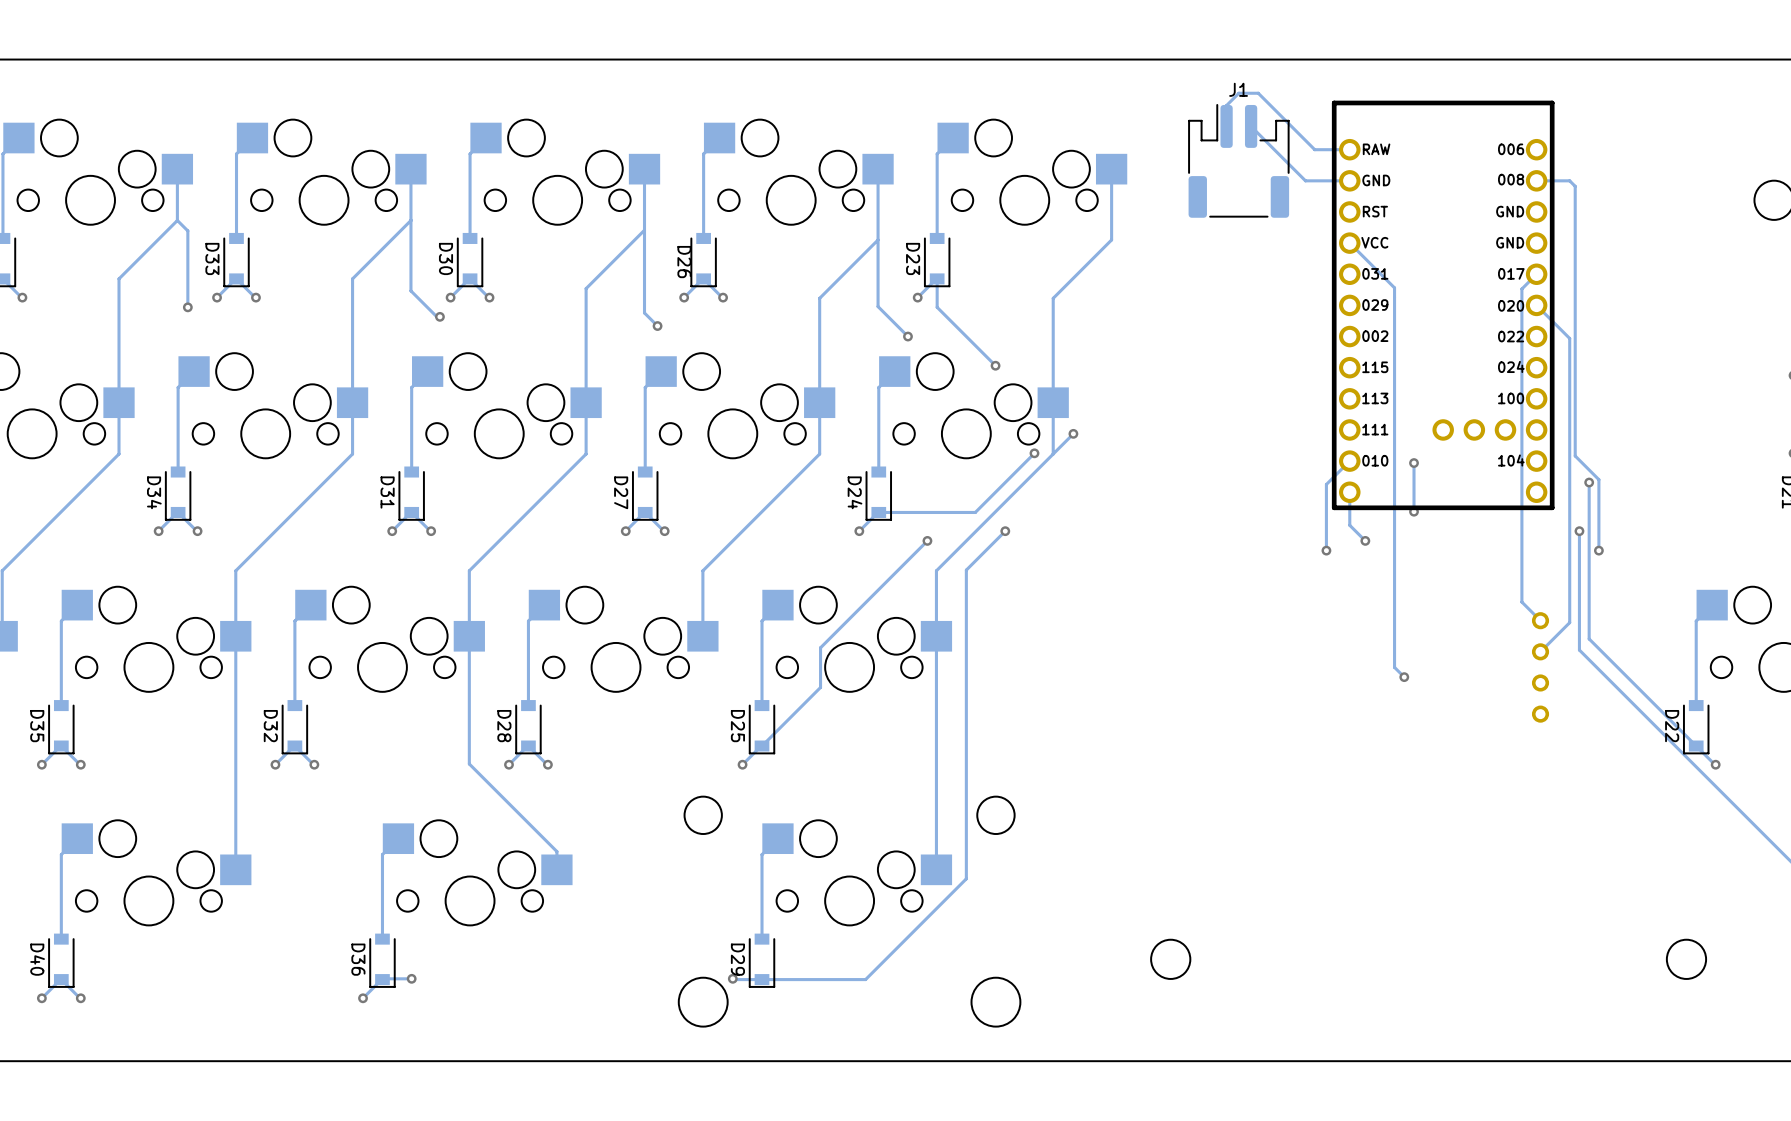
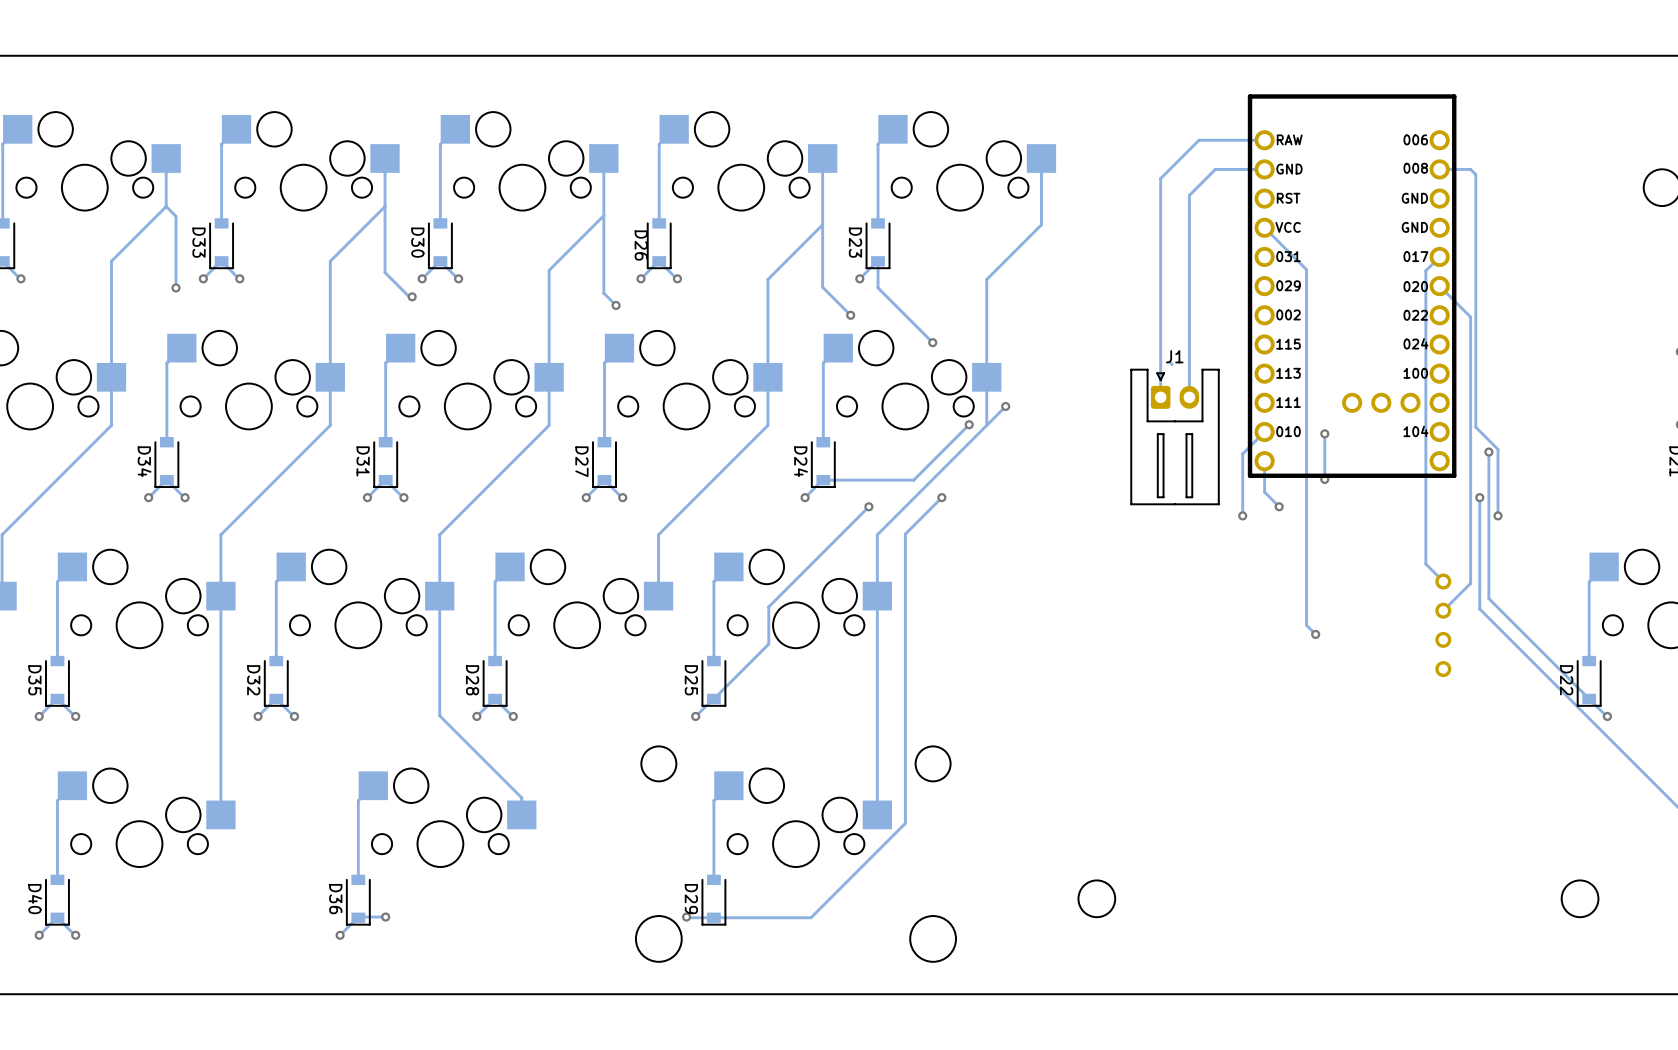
J1 footprint: [1188, 104, 1290, 218] -> [1130, 368, 1220, 505]
track: (1226, 126) (1226, 105) (1238, 93) (1258, 93) (1314, 149) -> (1160, 397) (1160, 178) (1198, 140) (1231, 140)
track: (1251, 126) (1305, 180) -> (1189, 397) (1189, 195) (1215, 169) (1223, 169)
track: none -> (1169, 362) (1172, 364)

